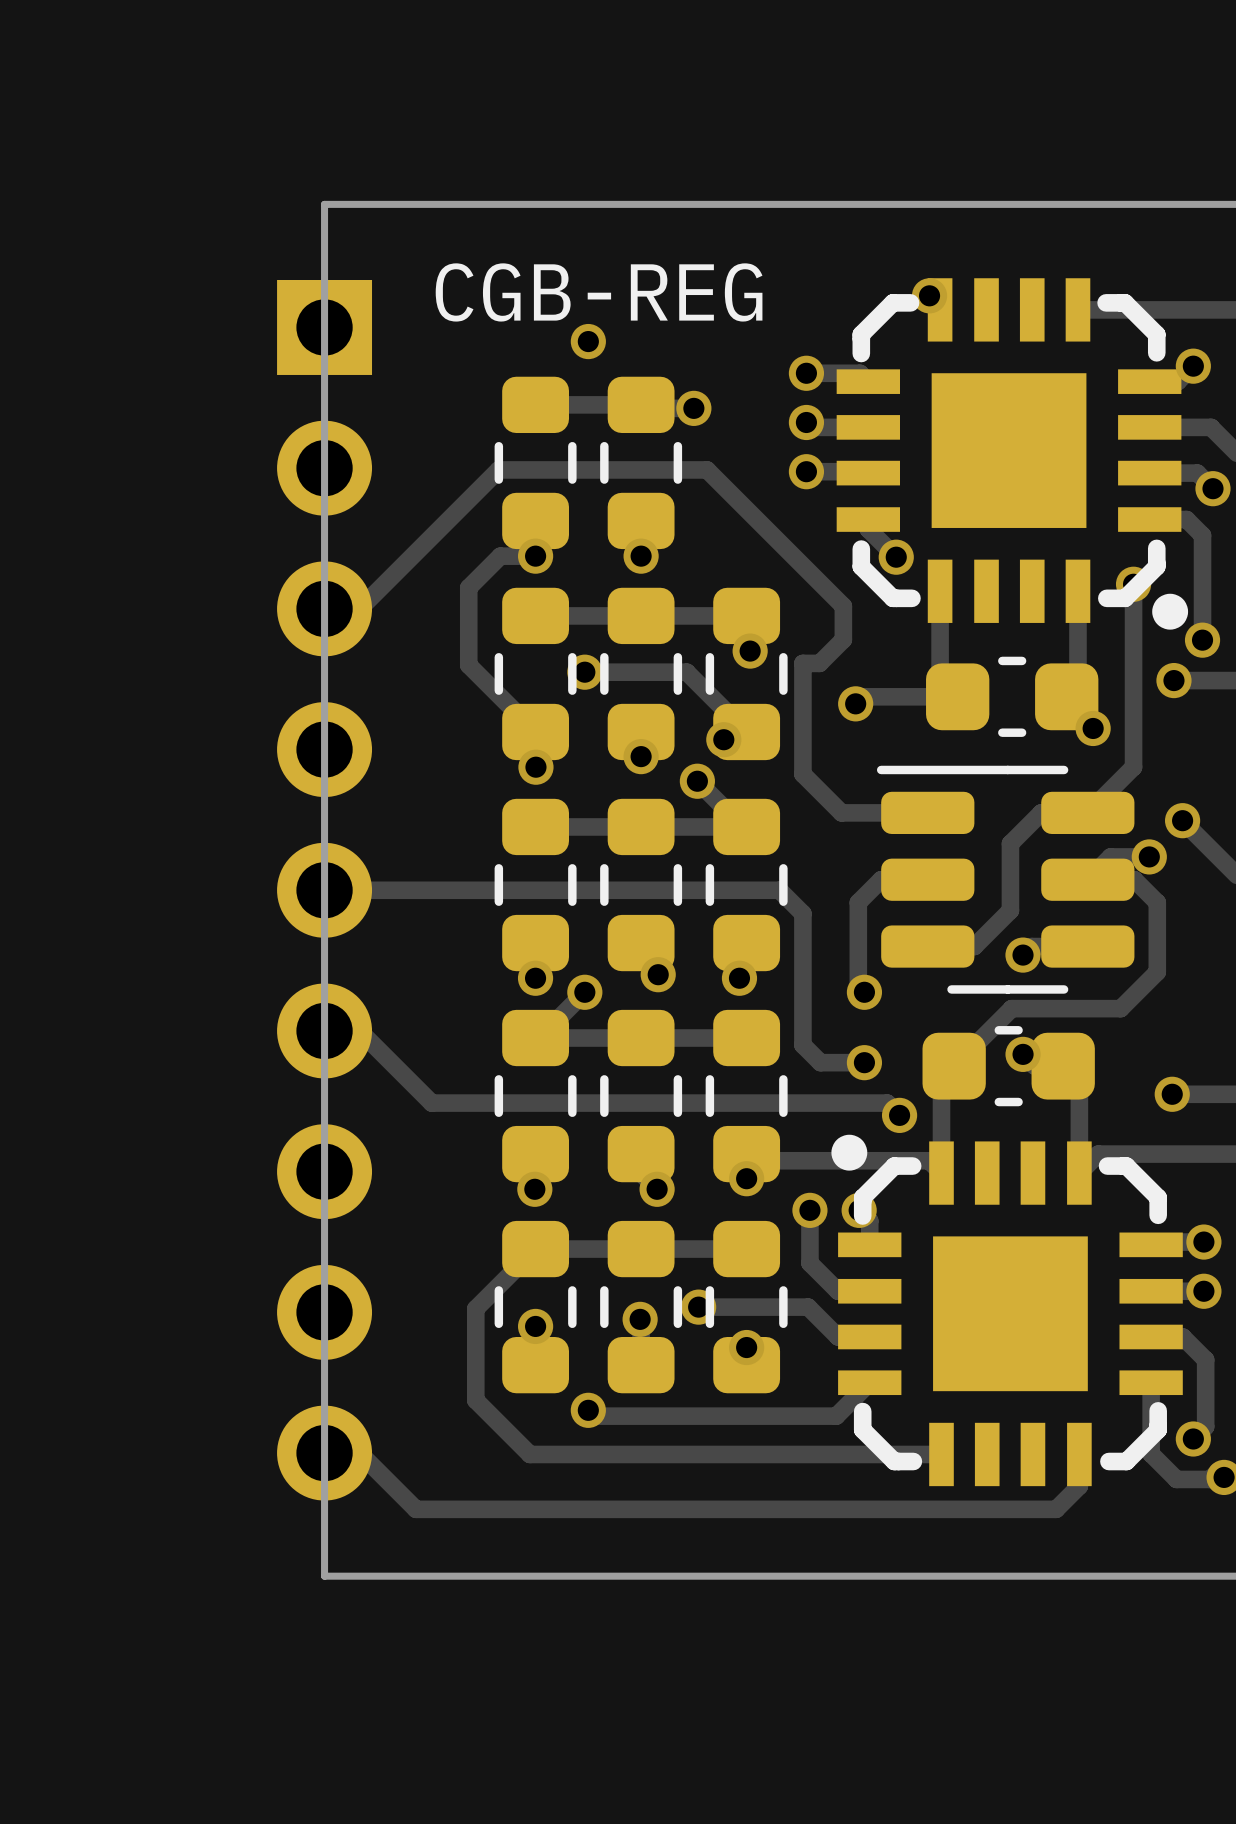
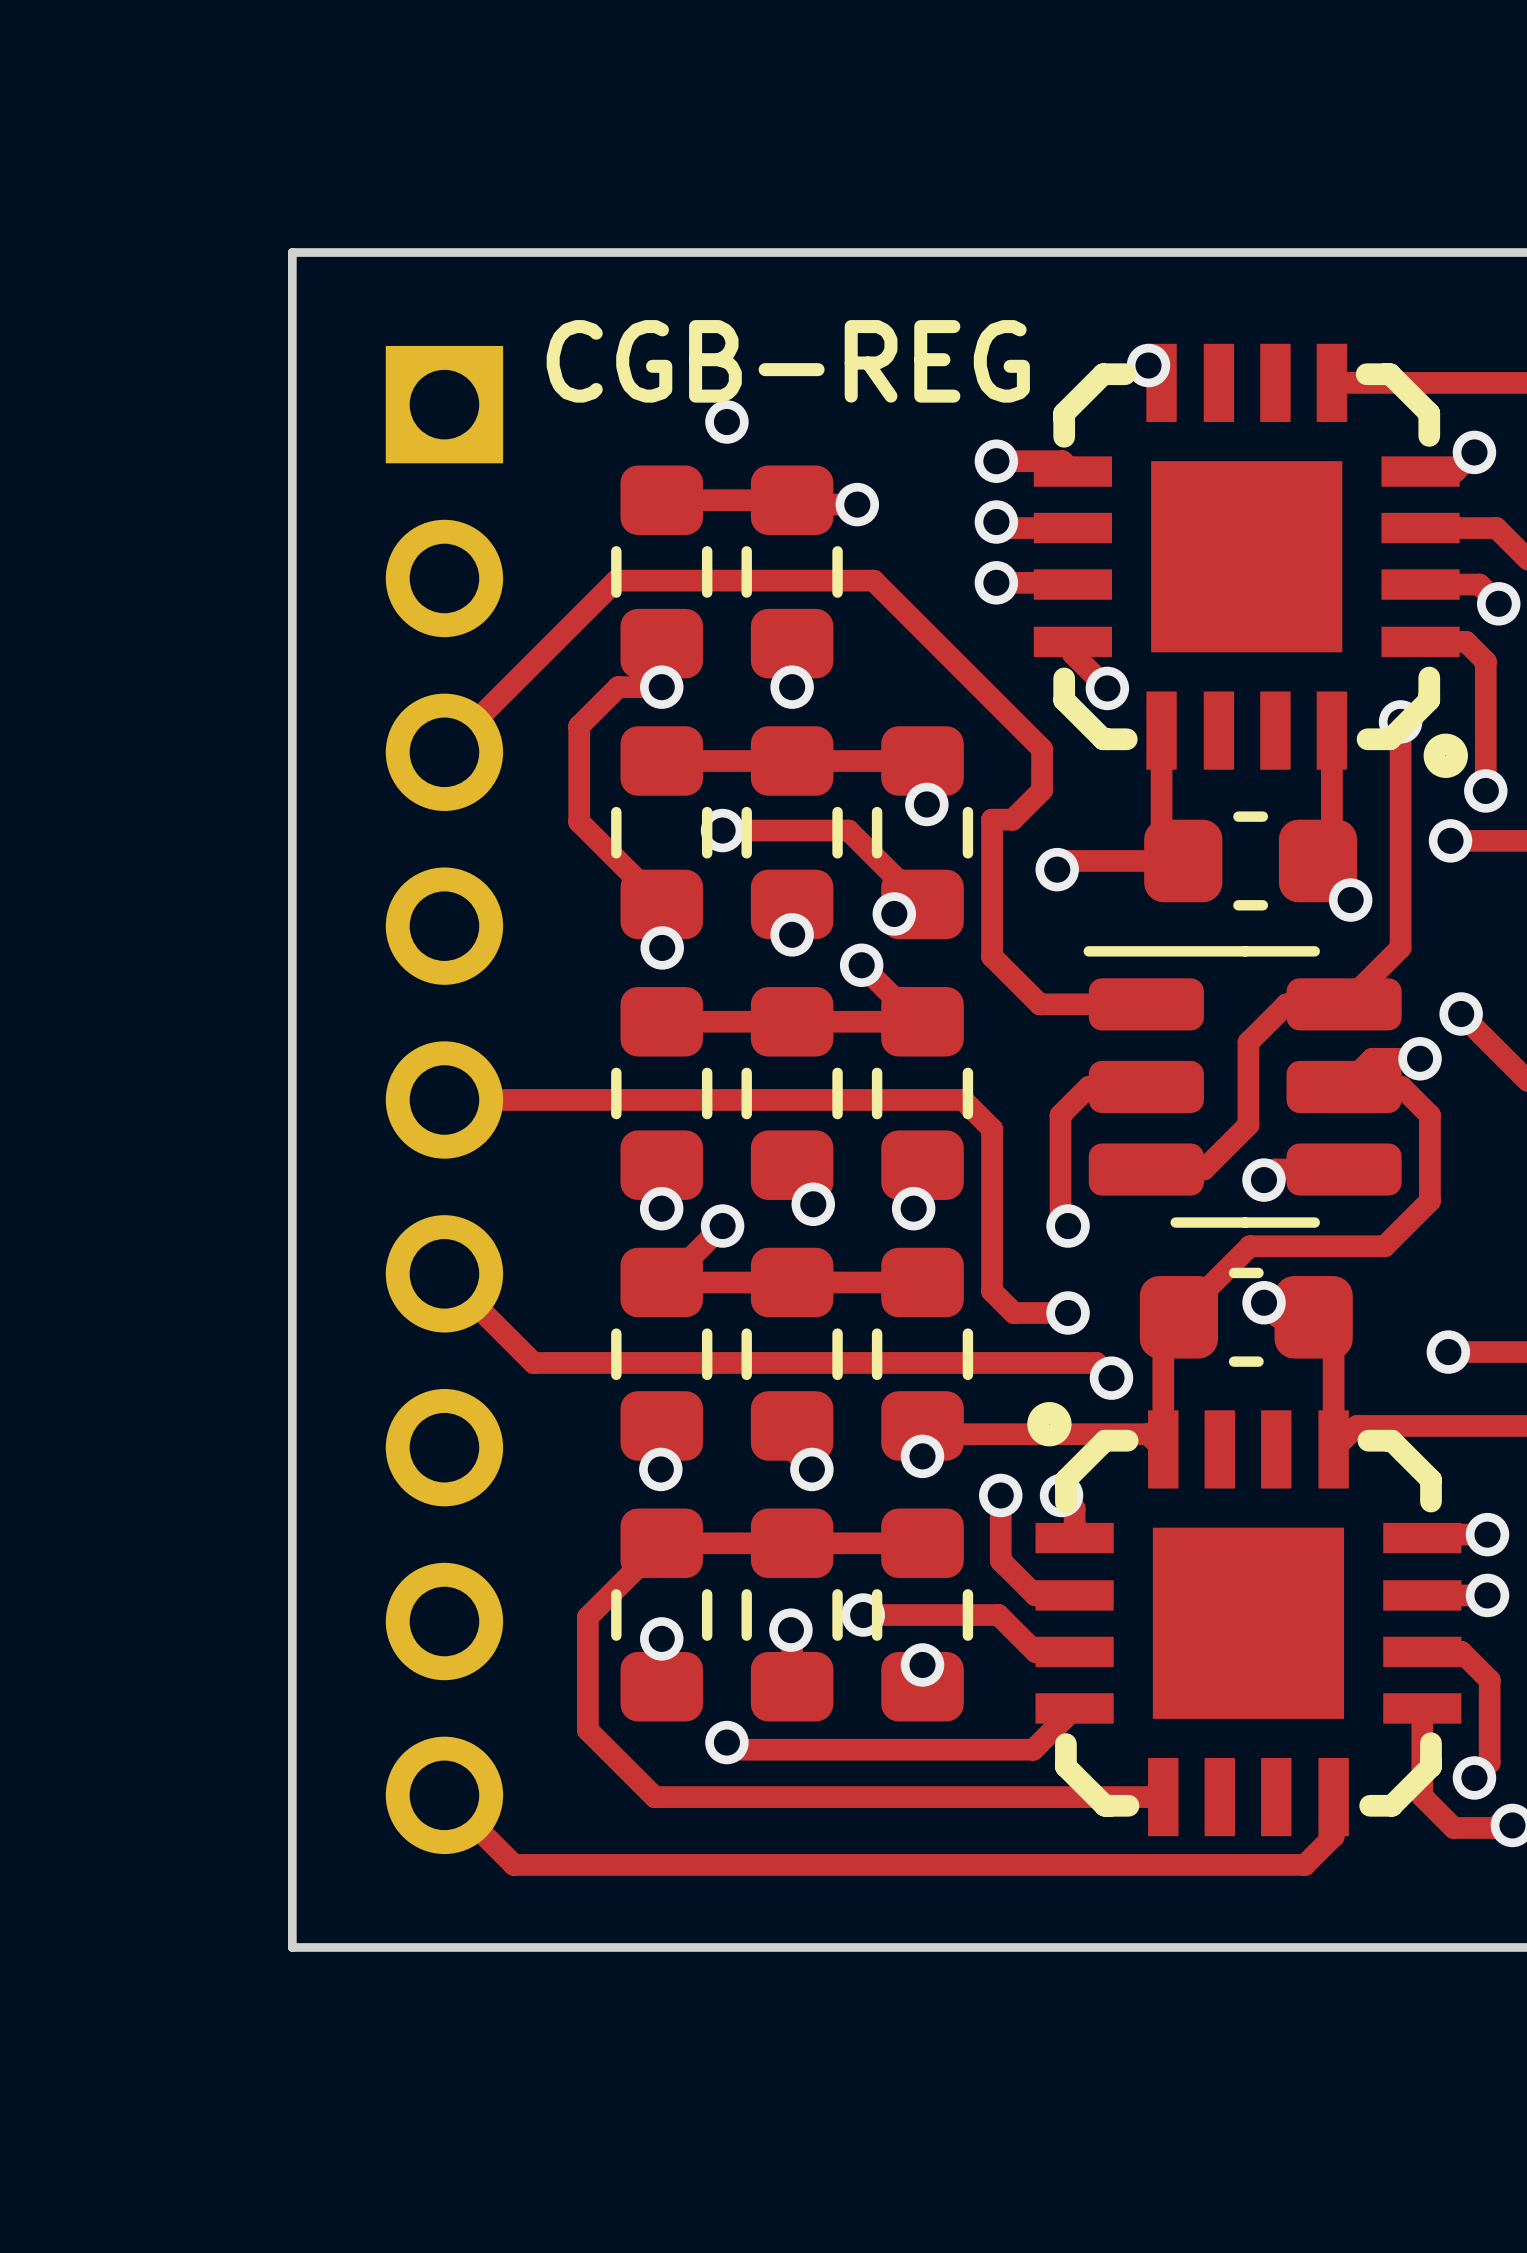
board edge: (324, 204) (324, 1576) -> (400, 252) (292, 252) (292, 1947) (400, 1947)
part position: (324, 890) -> (444, 1099)

